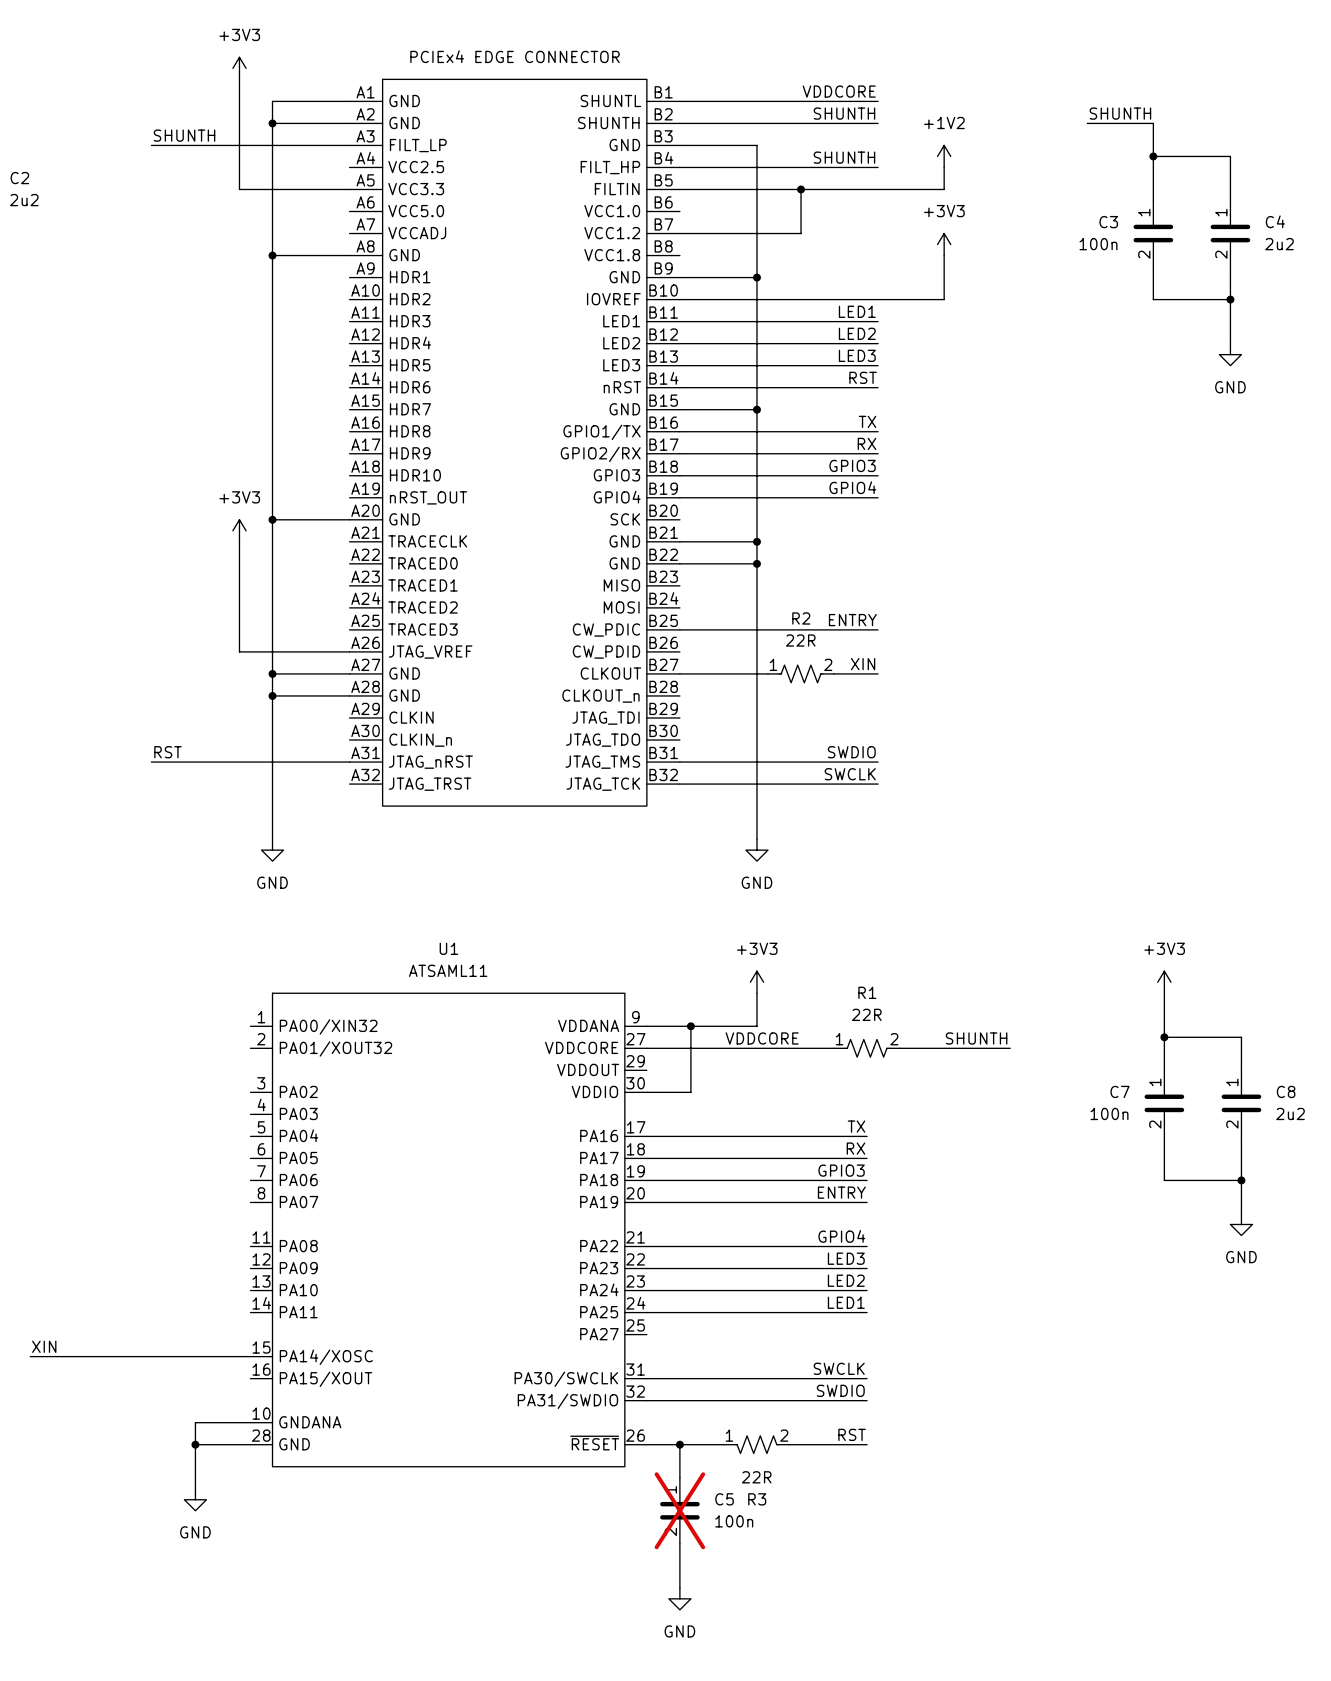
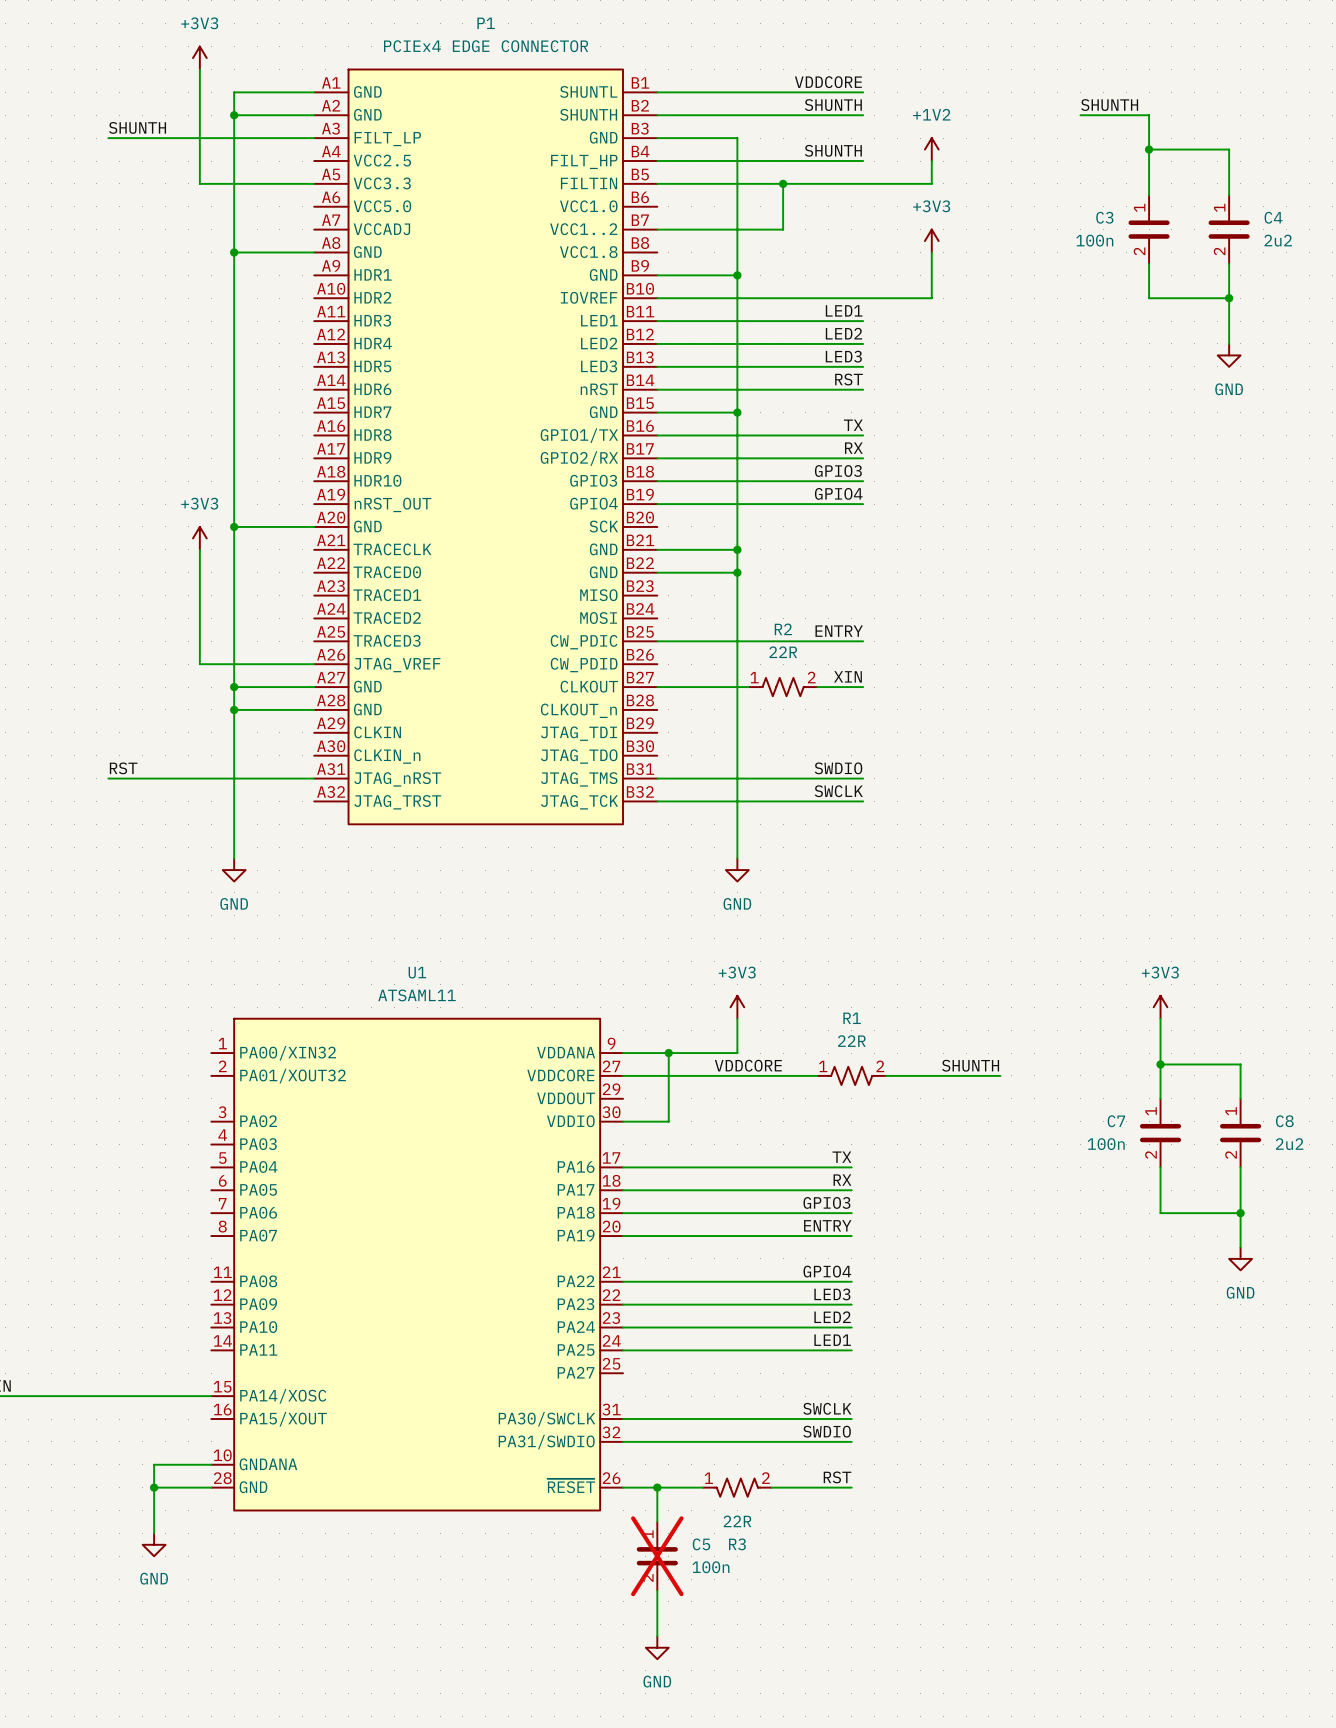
P1 name: none -> P1 (486, 23)
P1 pin name: VCC1.2 (612, 233) -> VCC1..2 (583, 229)

